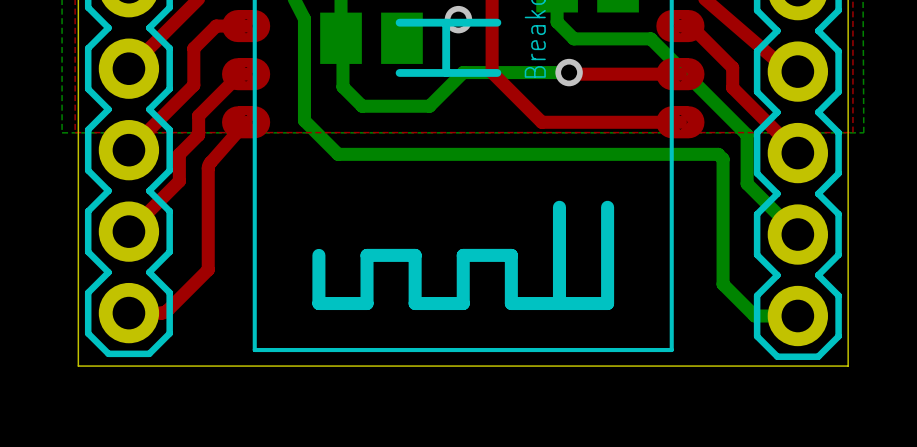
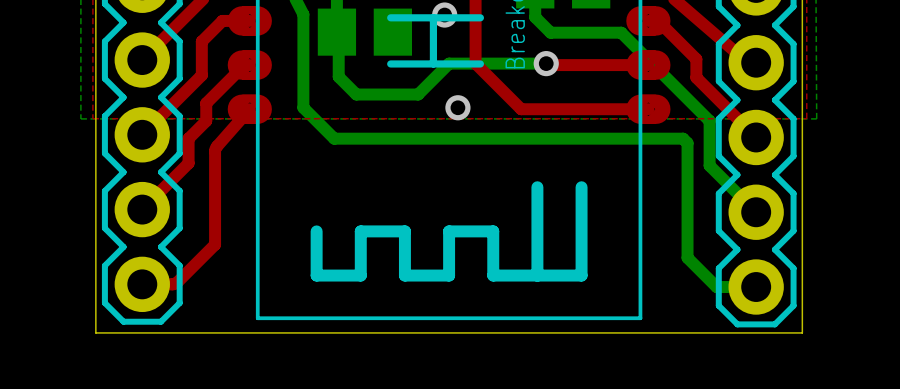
via: none -> (457, 107)

